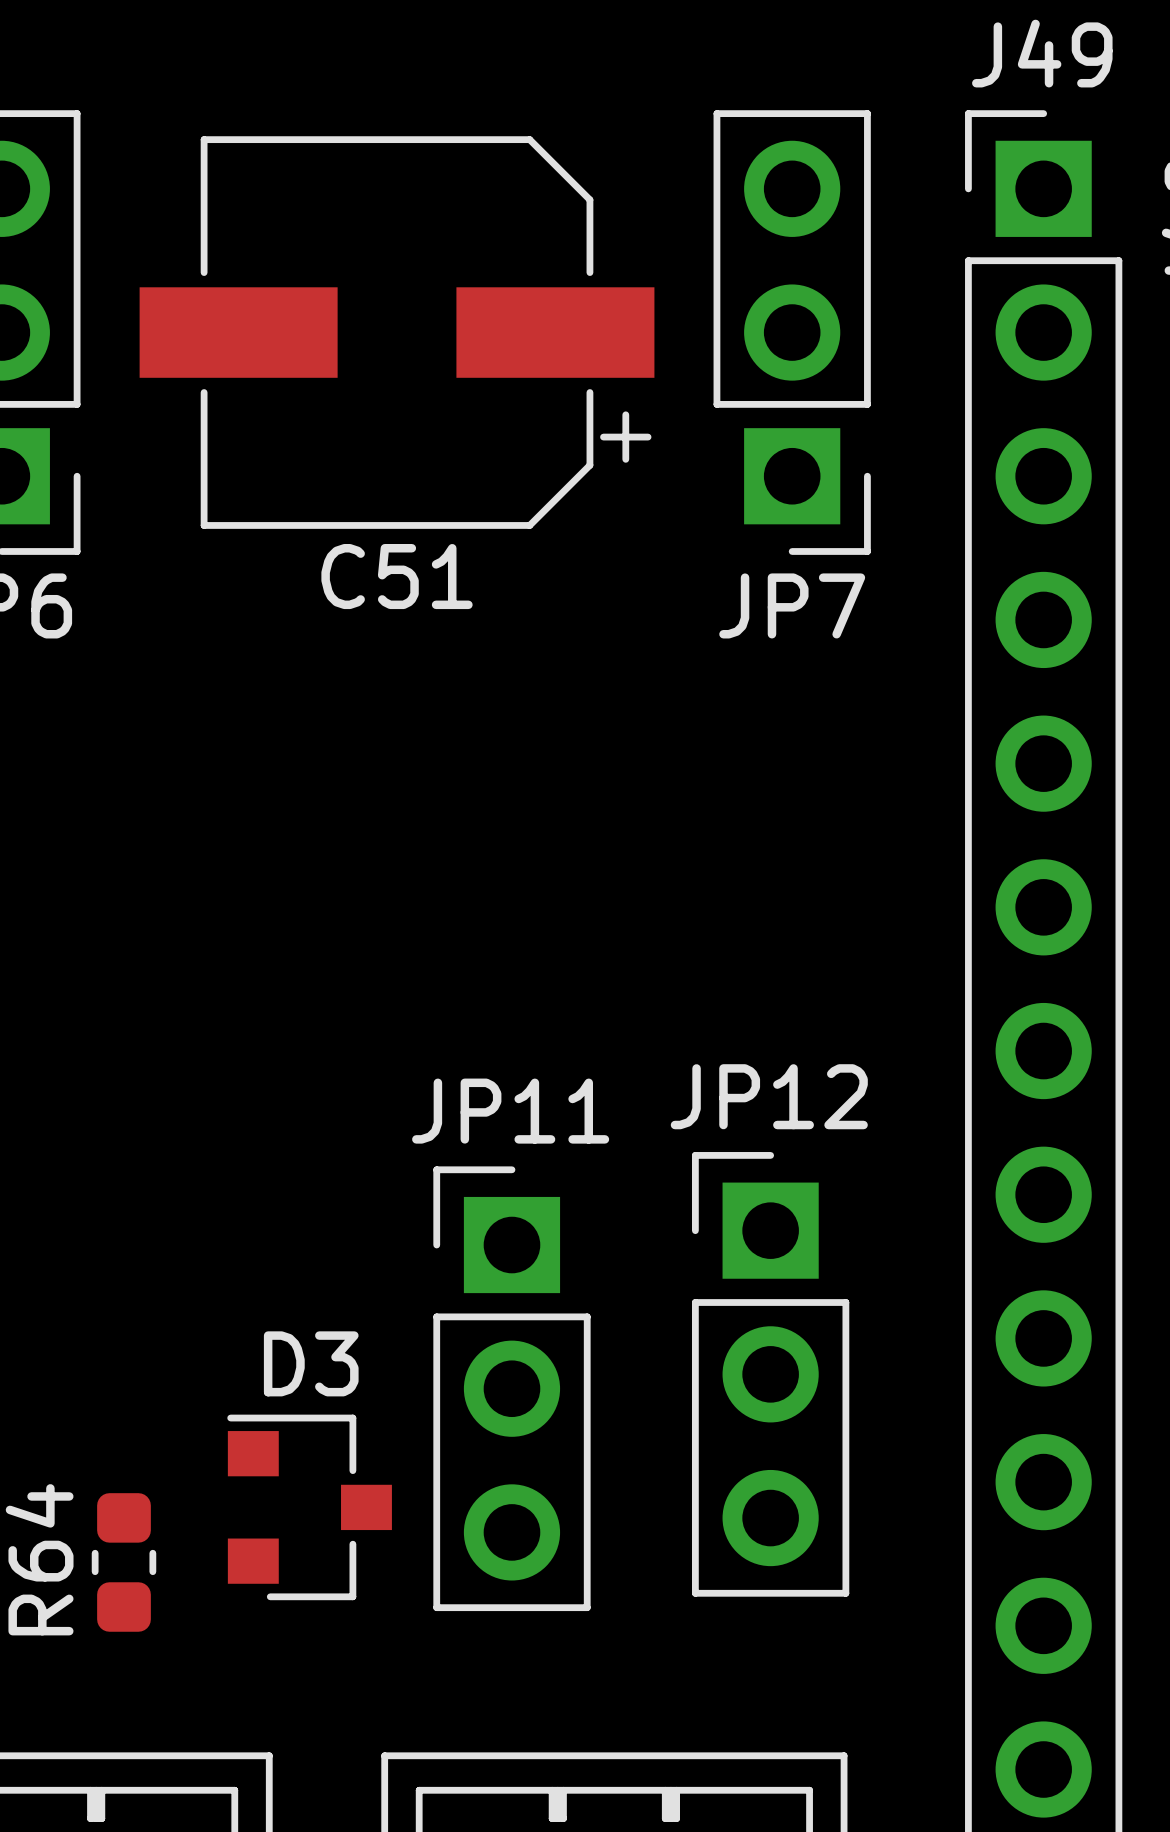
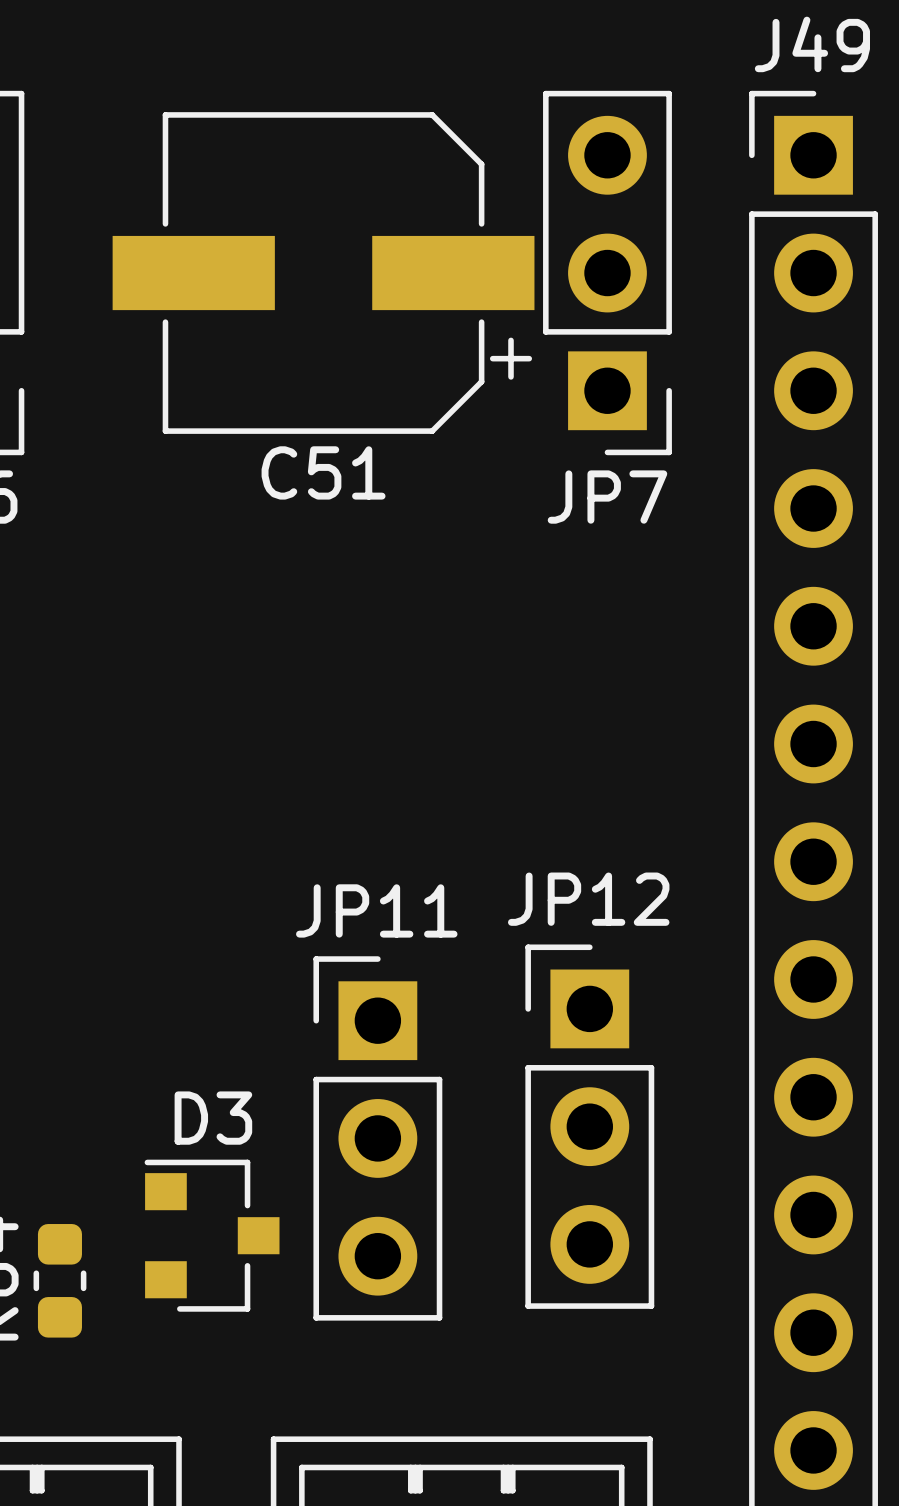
C51 position: (397, 332) -> (323, 273)

